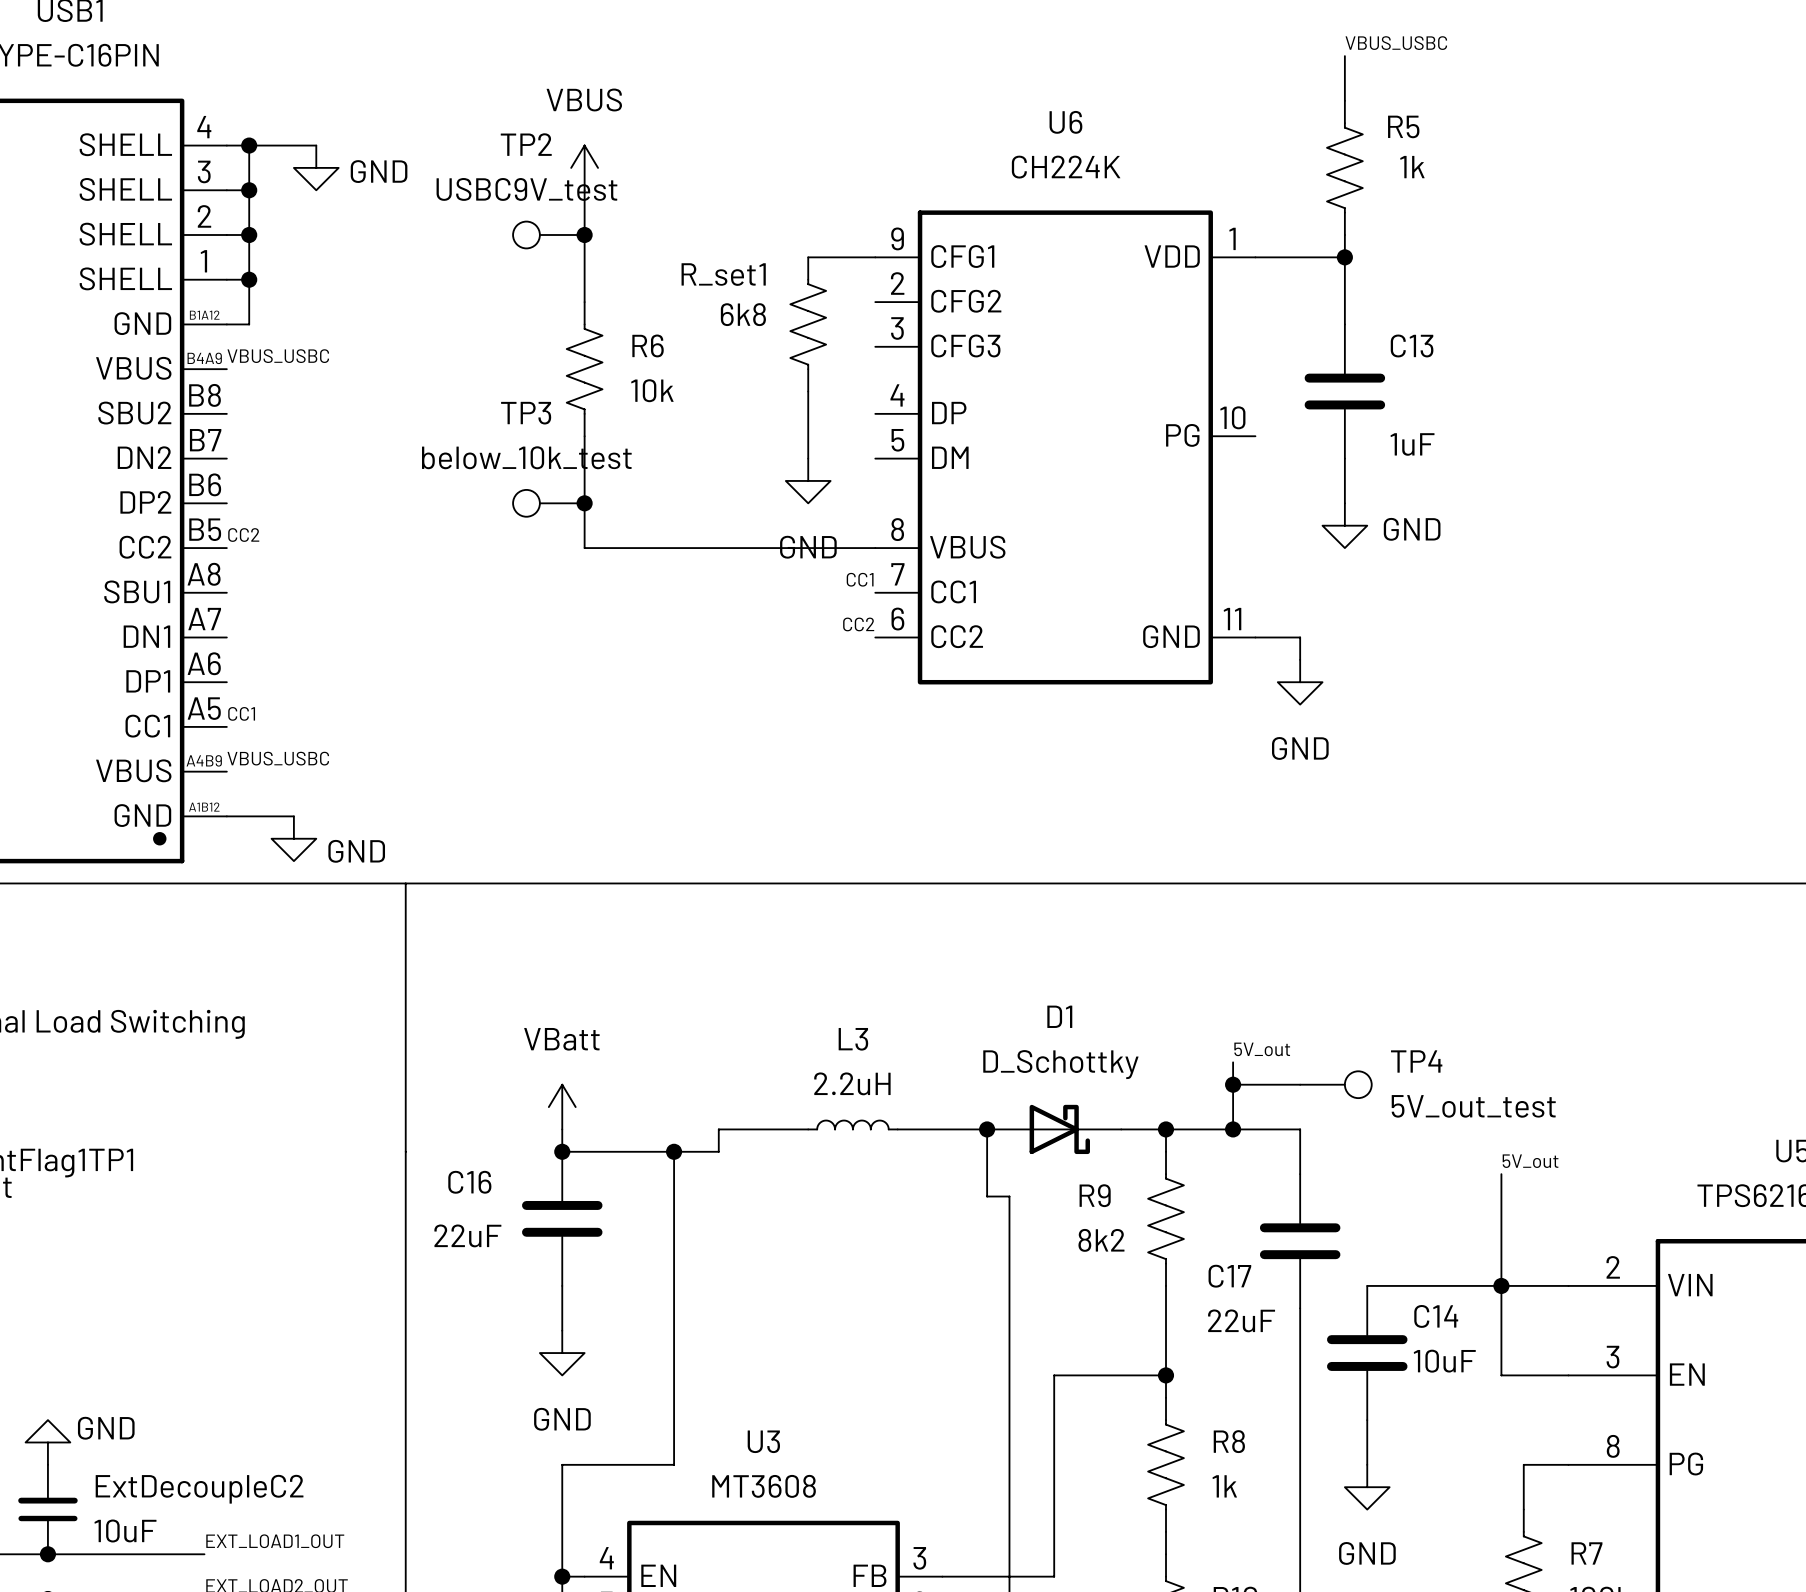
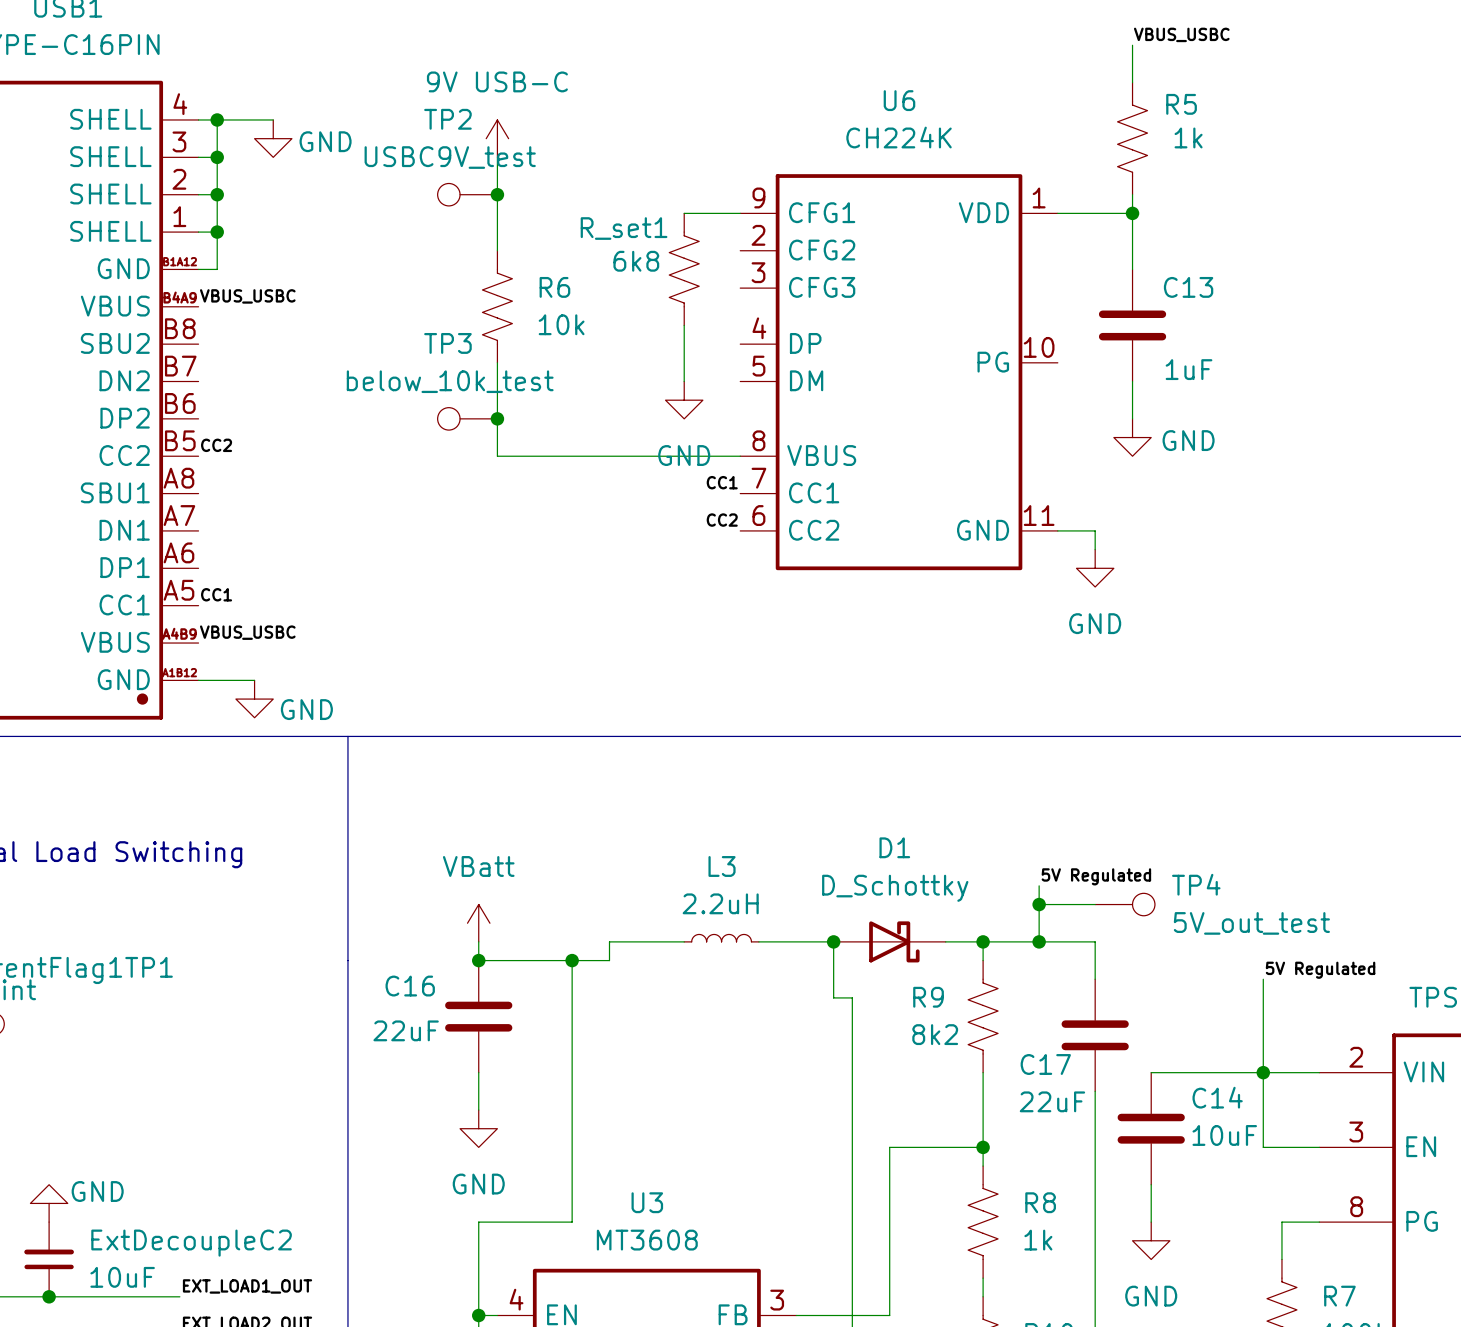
power symbol: VBUS (584, 167) -> 9V USB-C (497, 138)
label: 5V_out (1262, 1049) -> 5V Regulated (1096, 876)
label: 5V_out (1530, 1161) -> 5V Regulated (1320, 970)

